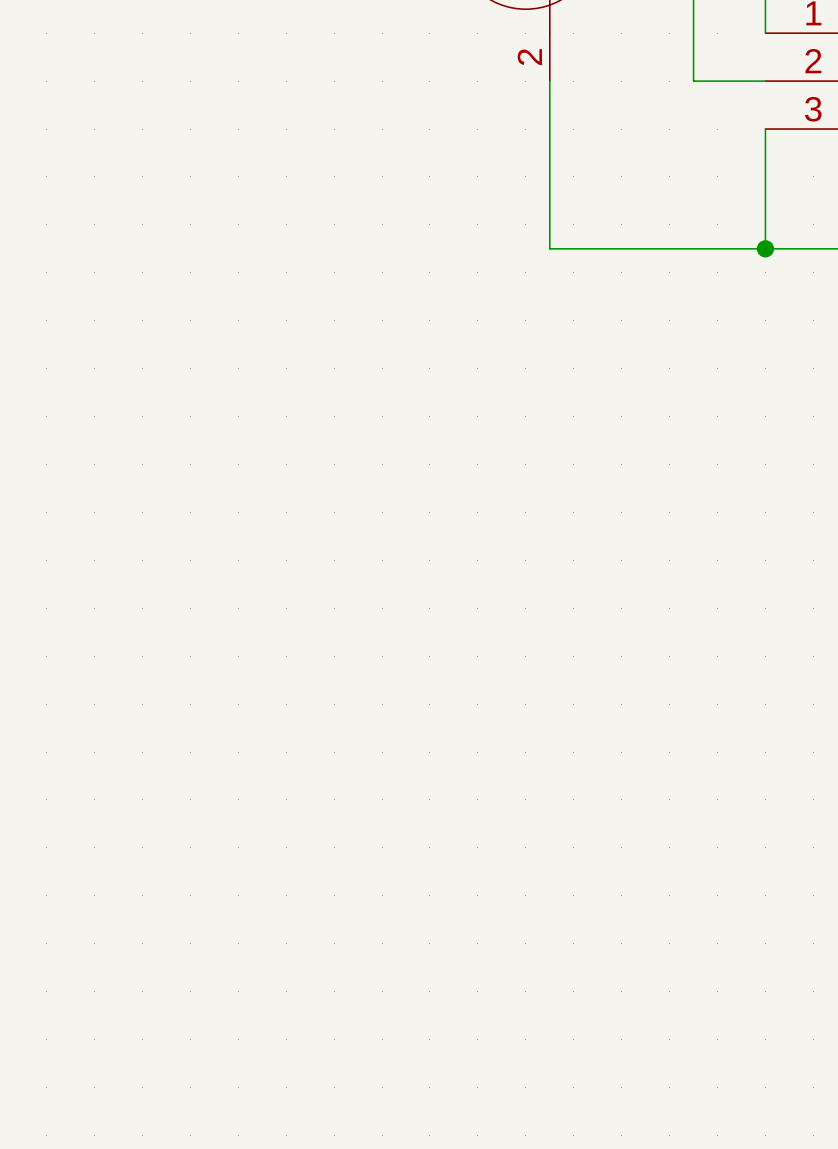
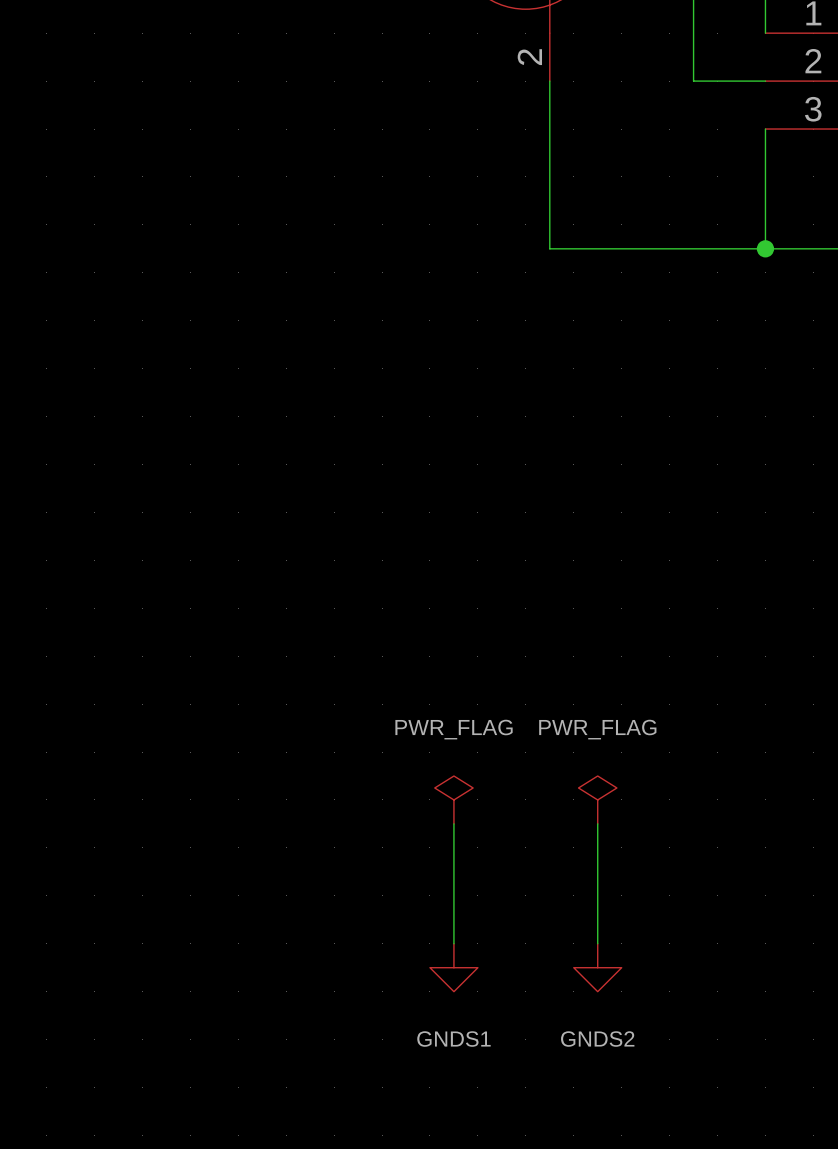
power symbol: none -> PWR_FLAG (453, 799)
power symbol: none -> PWR_FLAG (597, 799)
wire: none -> (453, 823) (453, 943)
wire: none -> (597, 823) (597, 943)
power symbol: none -> GNDS1 (453, 967)
power symbol: none -> GNDS2 (597, 967)

